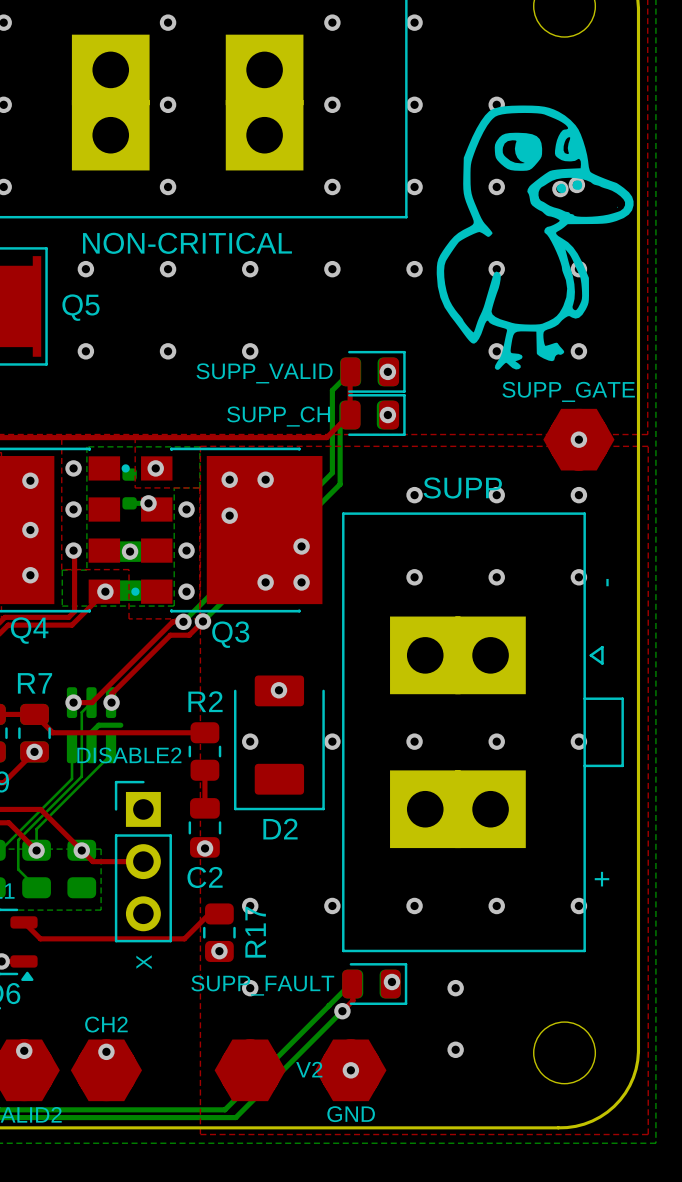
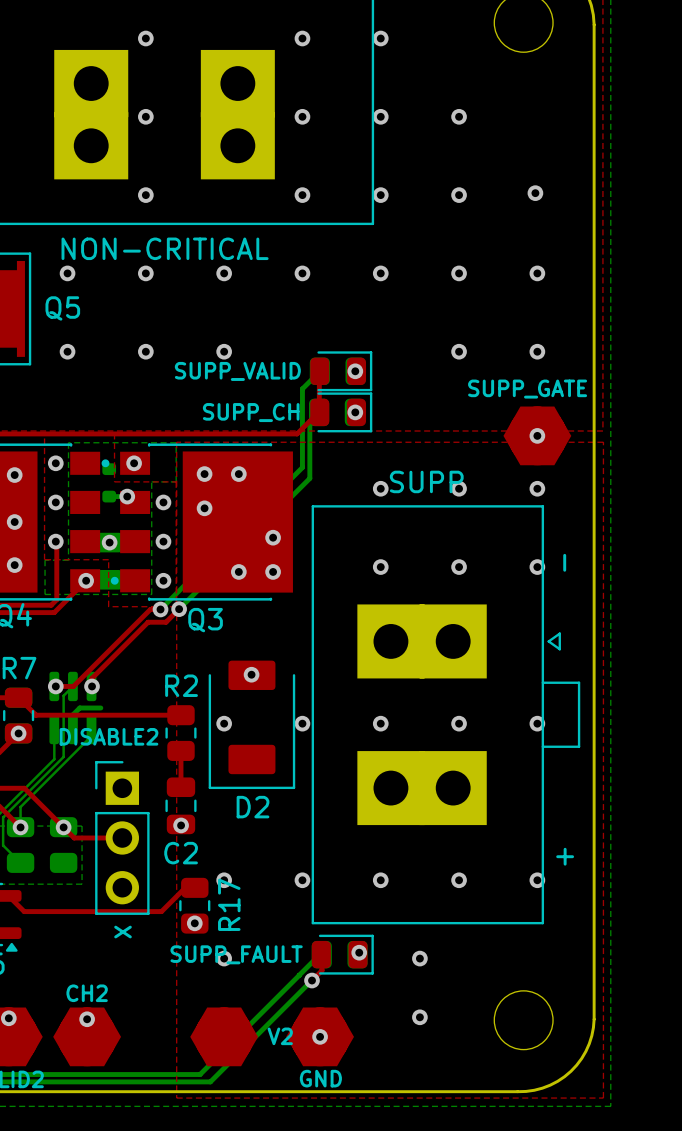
drawing: [436, 105, 634, 370] -> none
via: (560, 189) -> none

